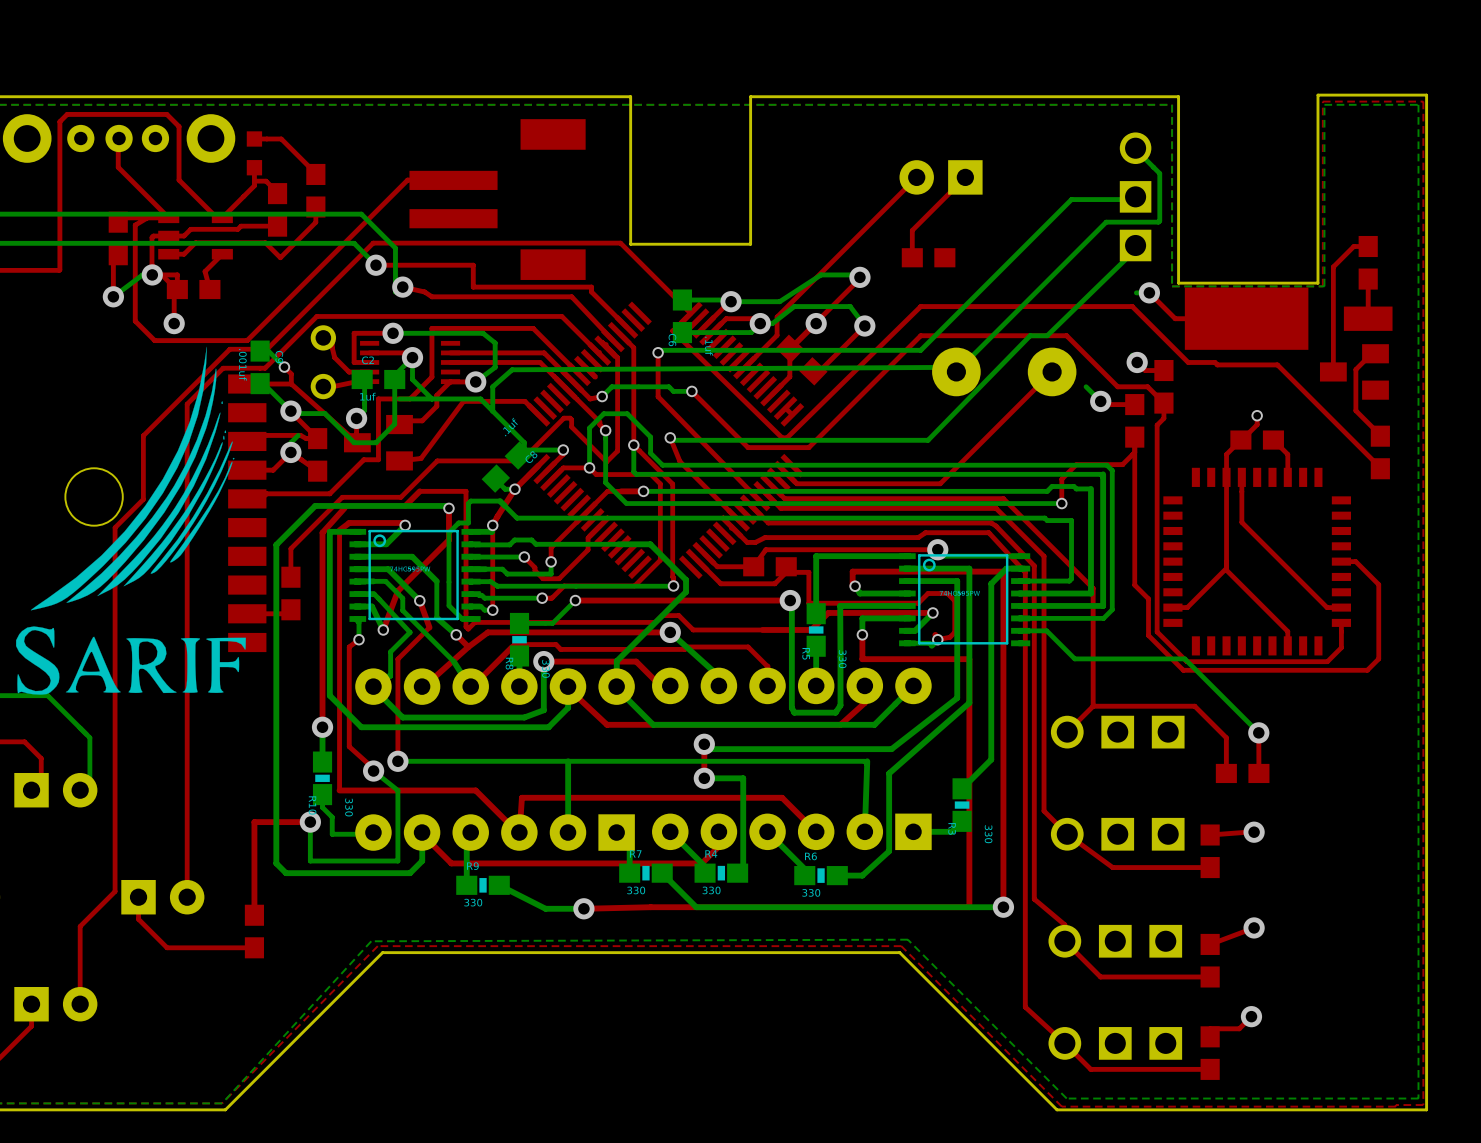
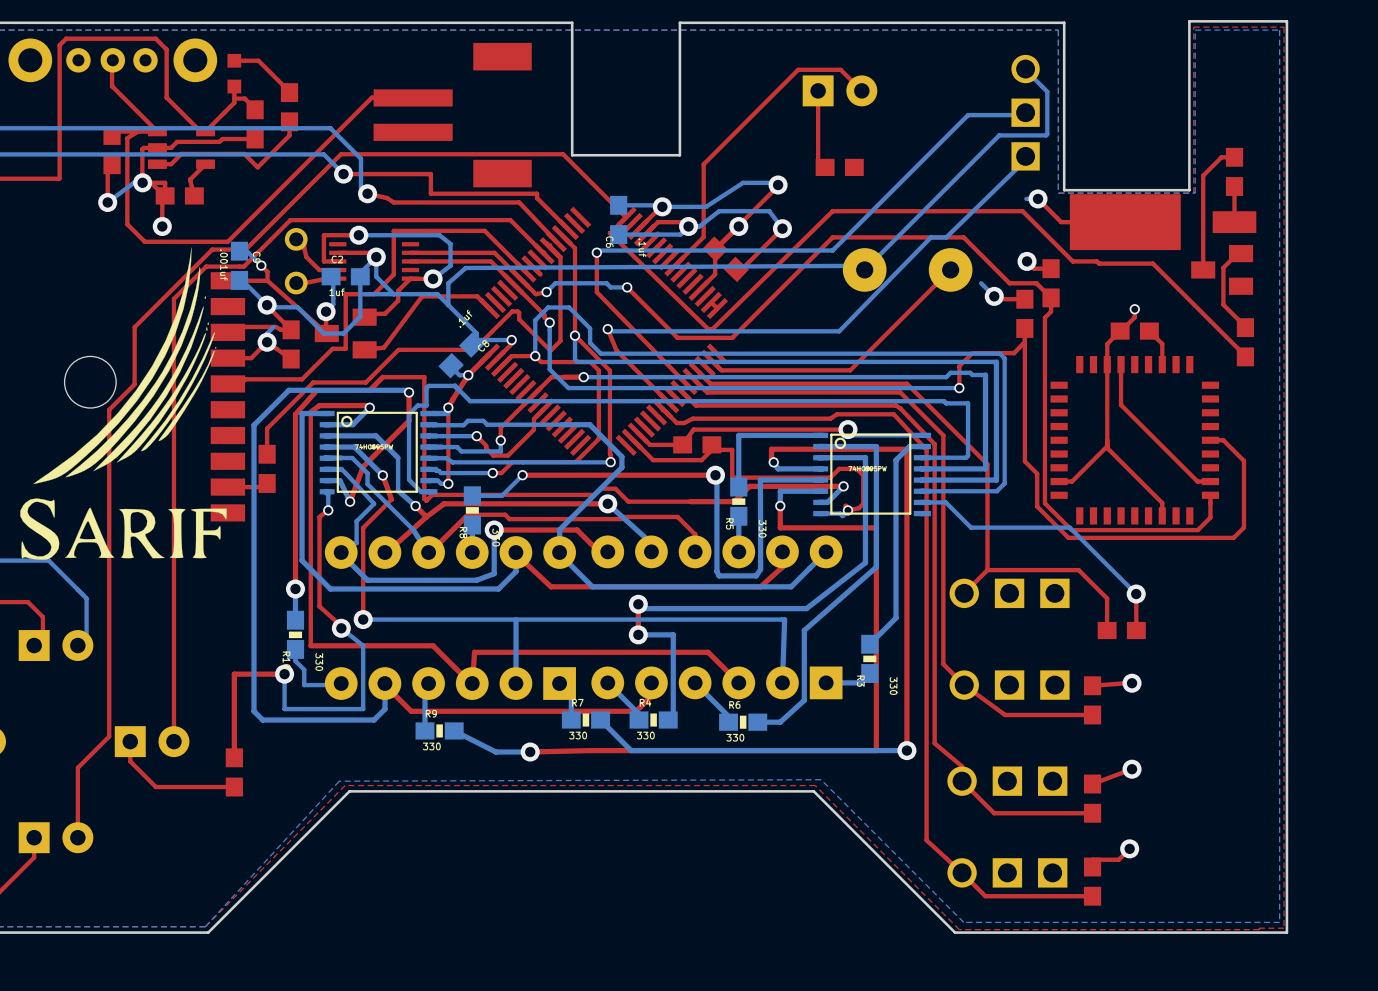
top track: none -> (818, 90) (818, 160) (825, 167)
top track: (916, 177) (777, 317) -> (861, 90) (840, 69) (798, 69) (703, 164) (703, 220)
part rotation: 0° (941, 177) -> 180° (839, 90)
top track: (965, 177) (912, 230) (912, 257) -> none

